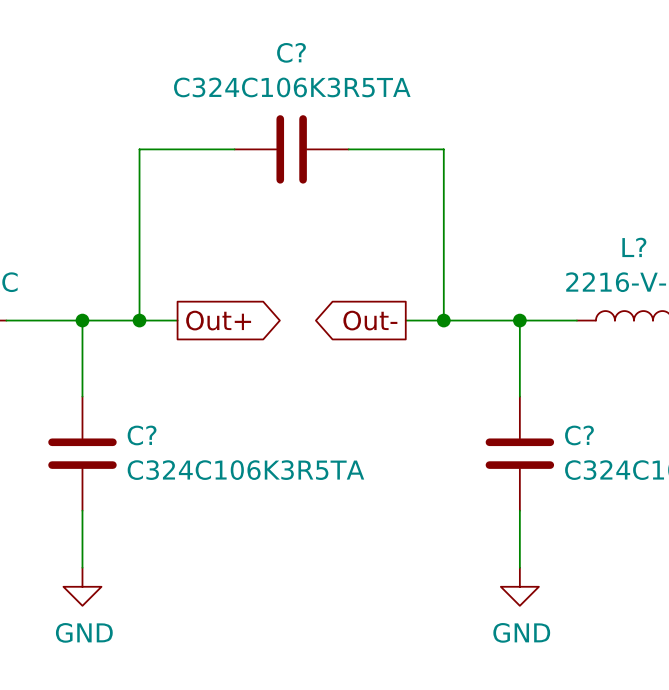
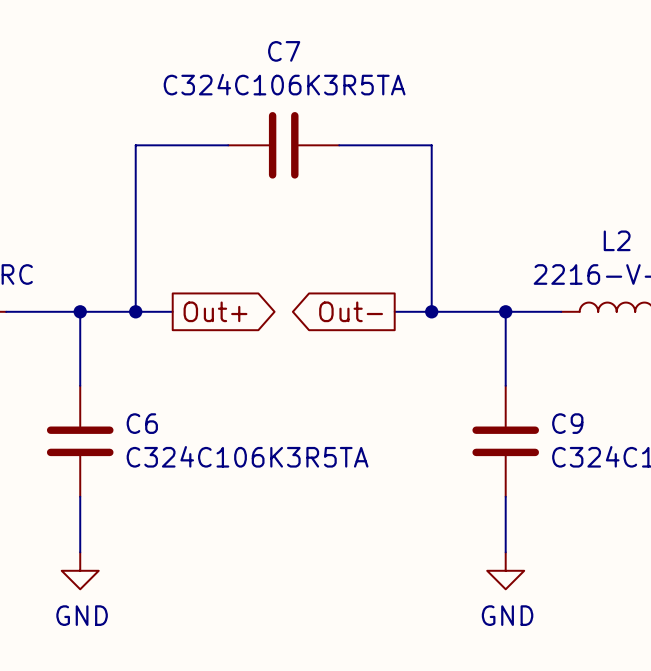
C? name: C? (291, 52) -> C7 (284, 51)
L? name: L? (634, 247) -> L2 (617, 240)
C? name: C? (142, 435) -> C6 (142, 423)
C? name: C? (579, 435) -> C9 (567, 423)

